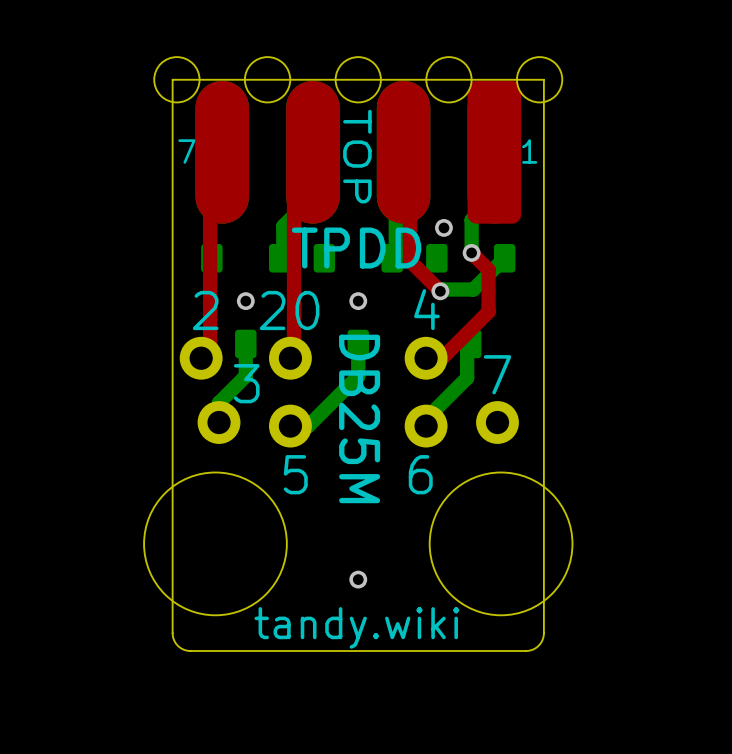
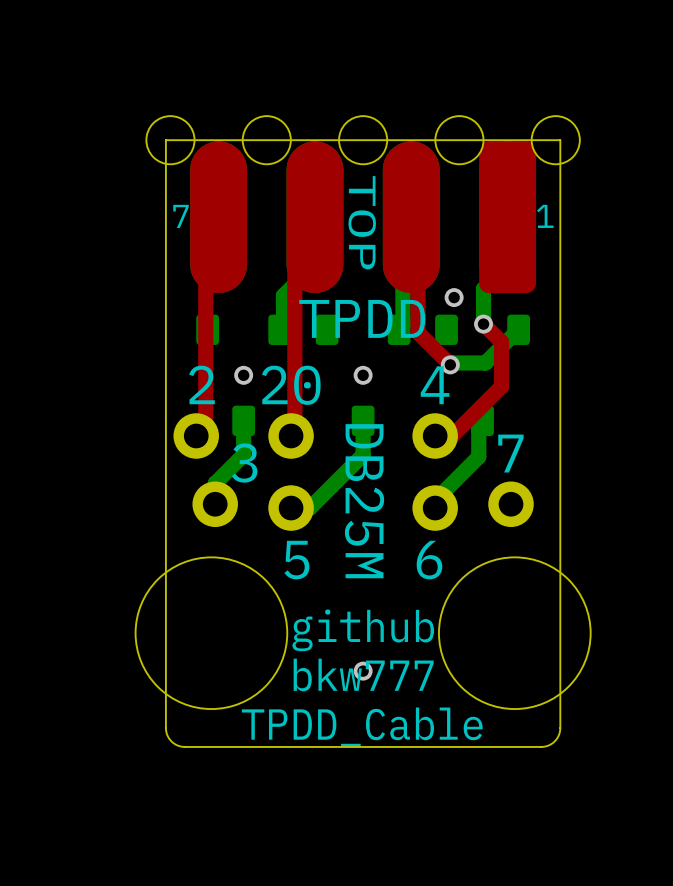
text: none -> github (363, 630)
text: none -> bkw777 (363, 675)
text: tandy.wiki (356, 627) -> TPDD_Cable (362, 727)

